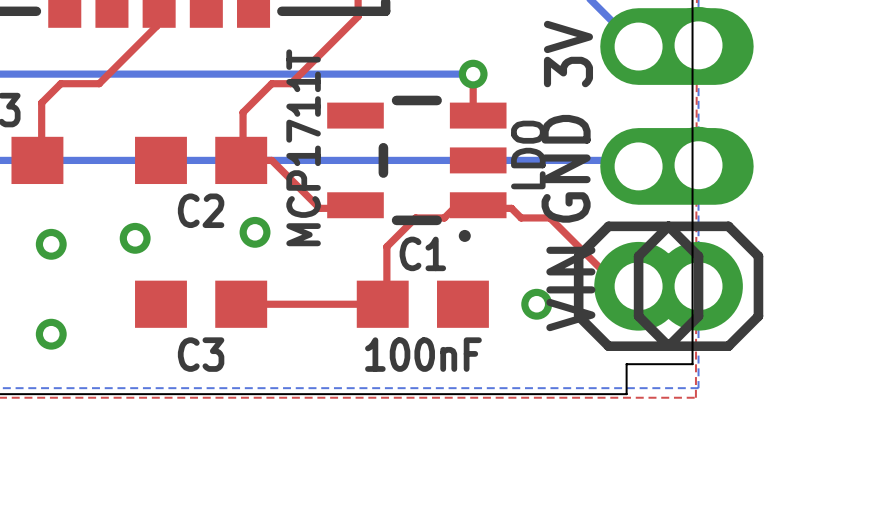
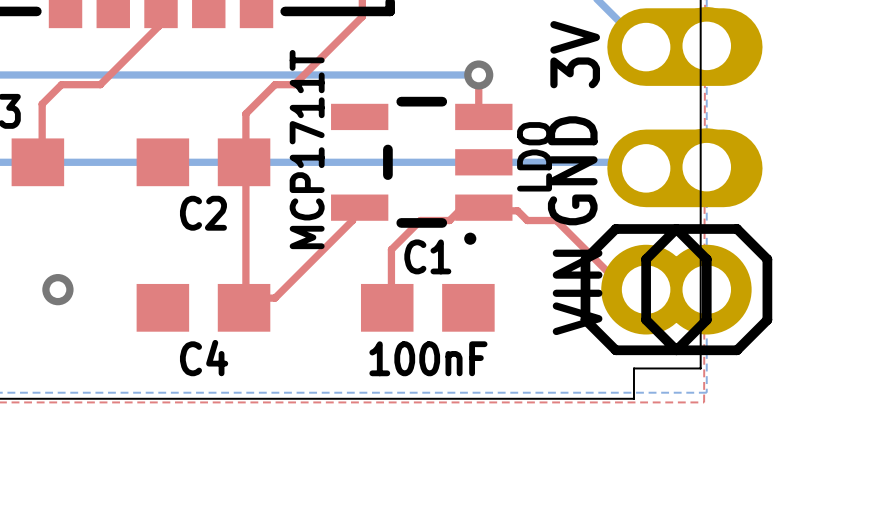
top track: (243, 160) (271, 160) (319, 208) (348, 208) -> (245, 298) (275, 298) (352, 220) (352, 210)
top track: none -> (245, 162) (245, 298)
via: (255, 232) -> none
via: (135, 238) -> none
via: (51, 244) -> none
via: none -> (57, 289)
top track: (241, 304) (382, 304) -> none
via: (536, 304) -> none
via: (51, 334) -> none
C3 name: C3 (201, 354) -> C4 (204, 358)

